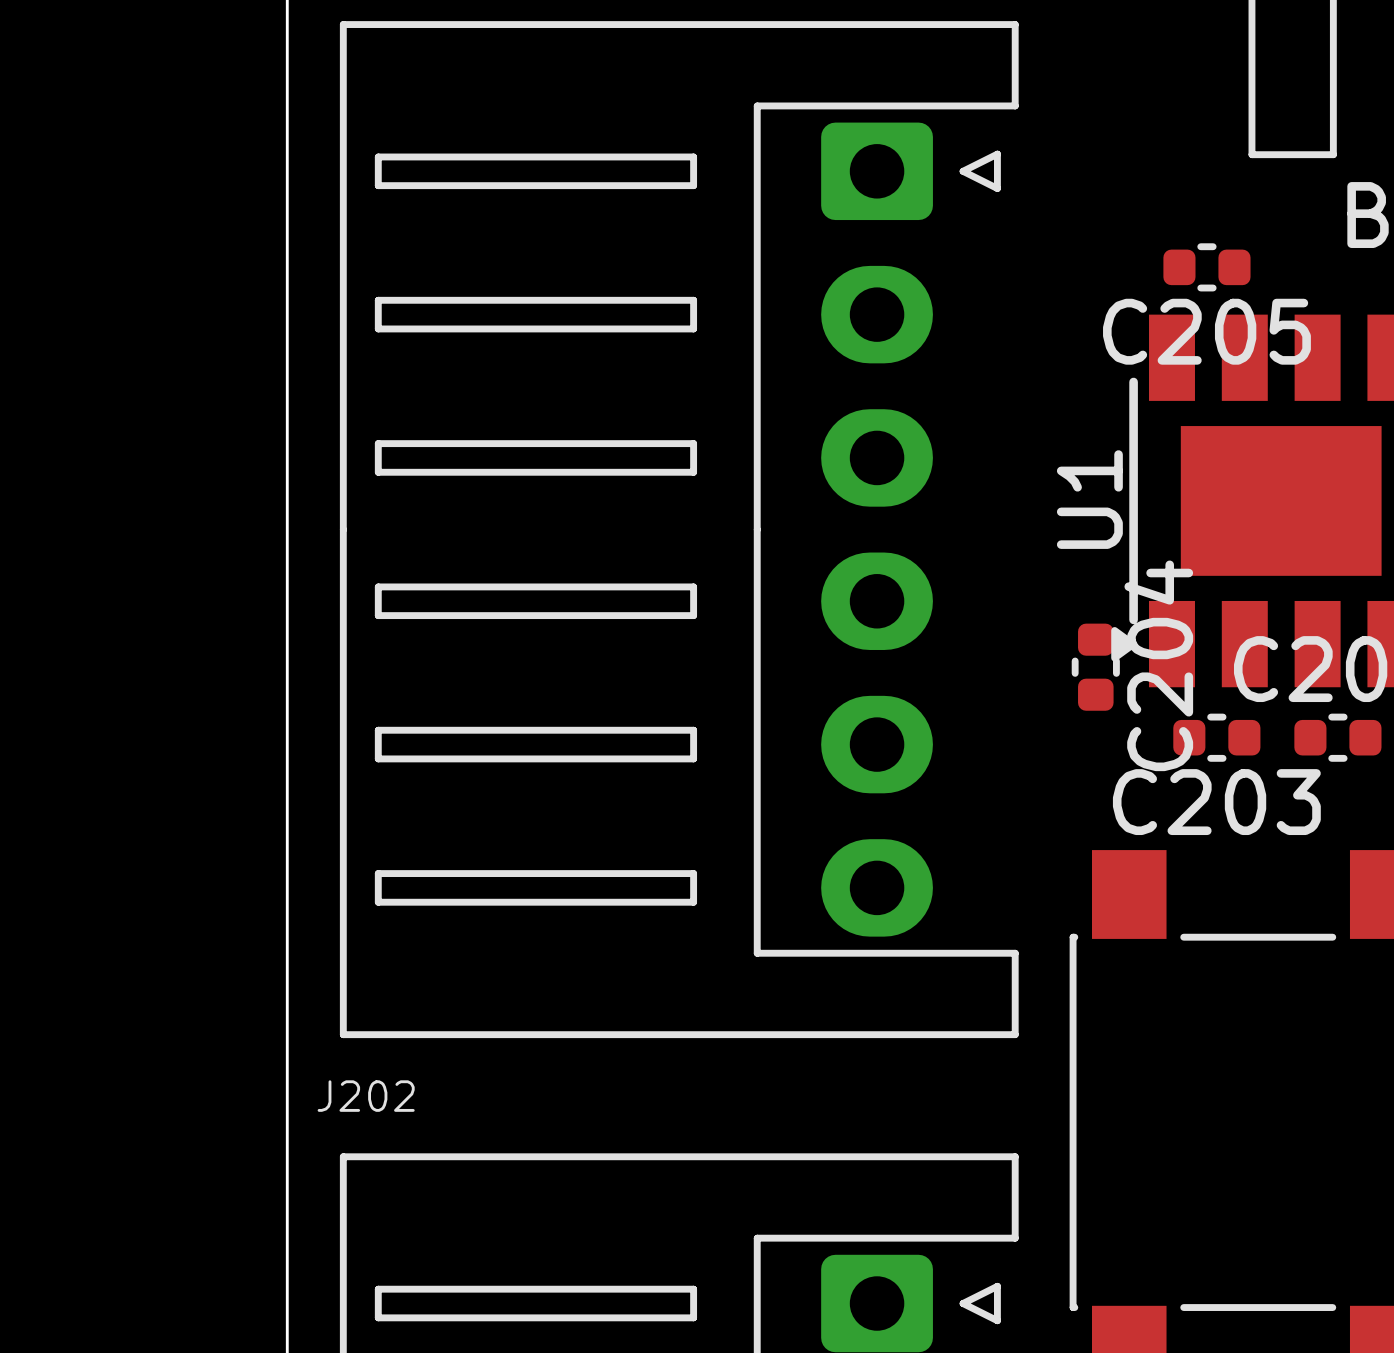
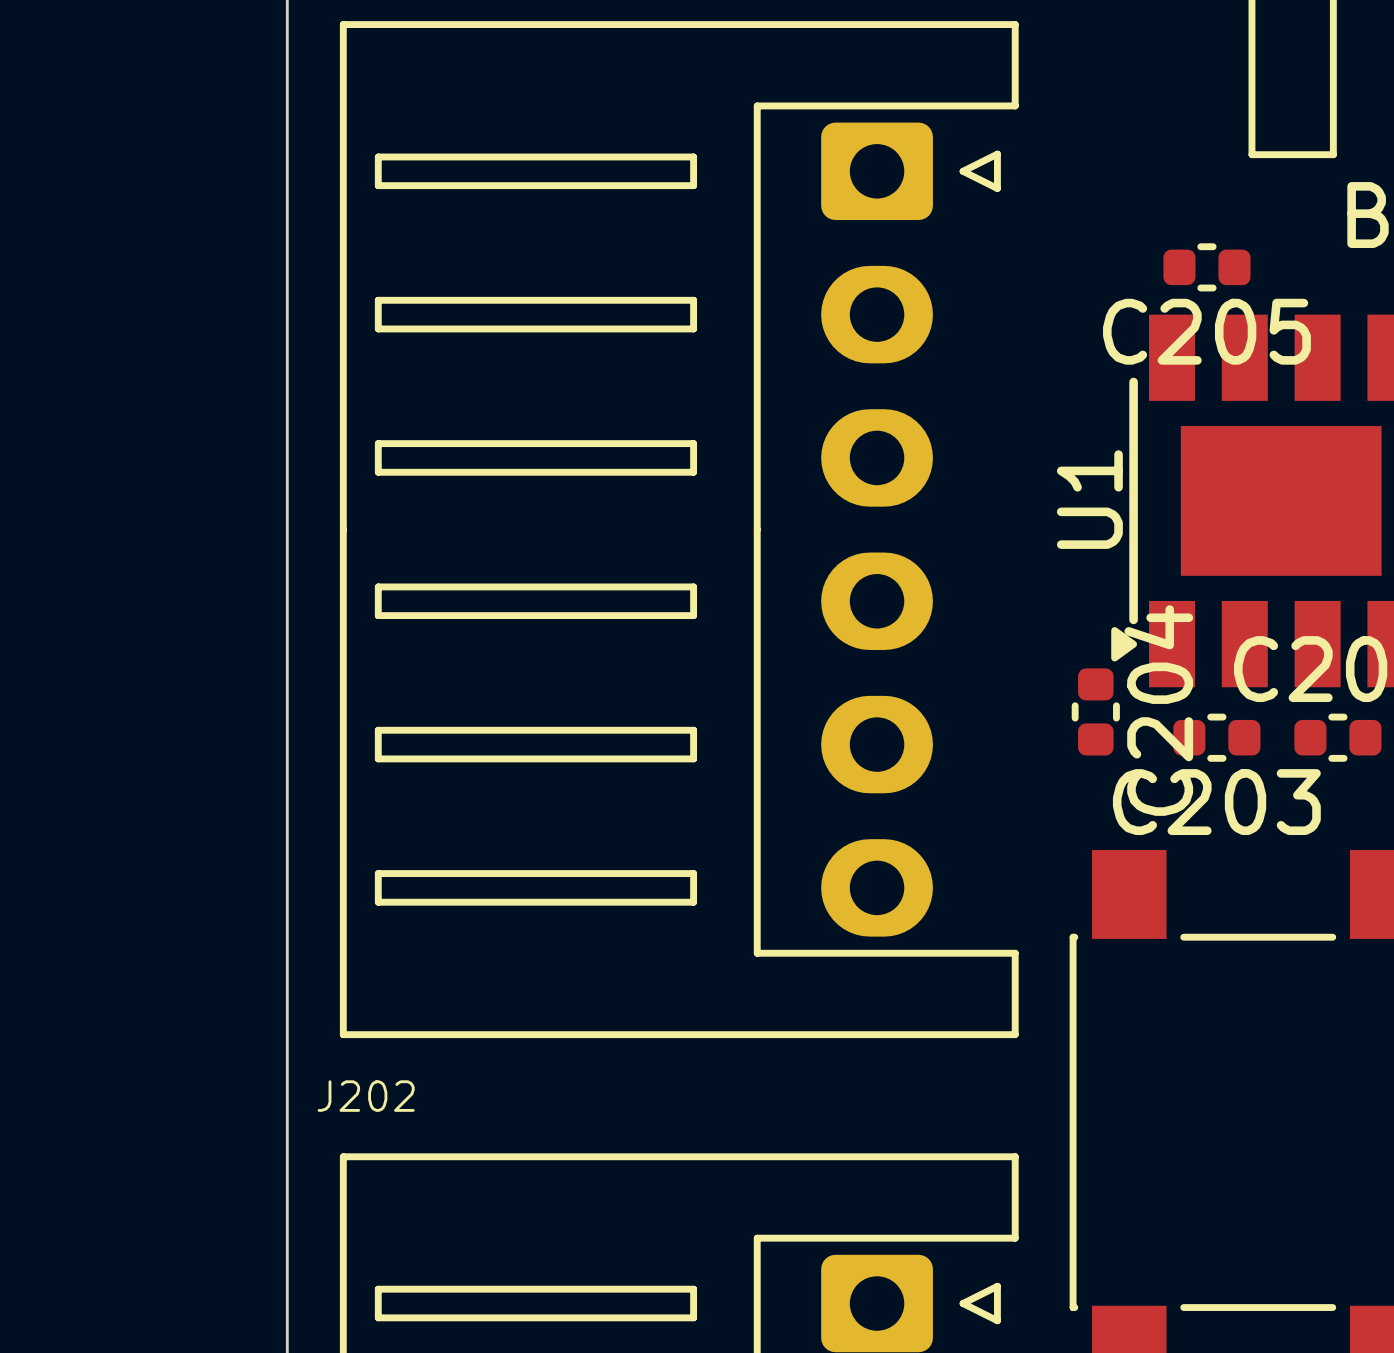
C204 position: (1095, 667) -> (1095, 711)

